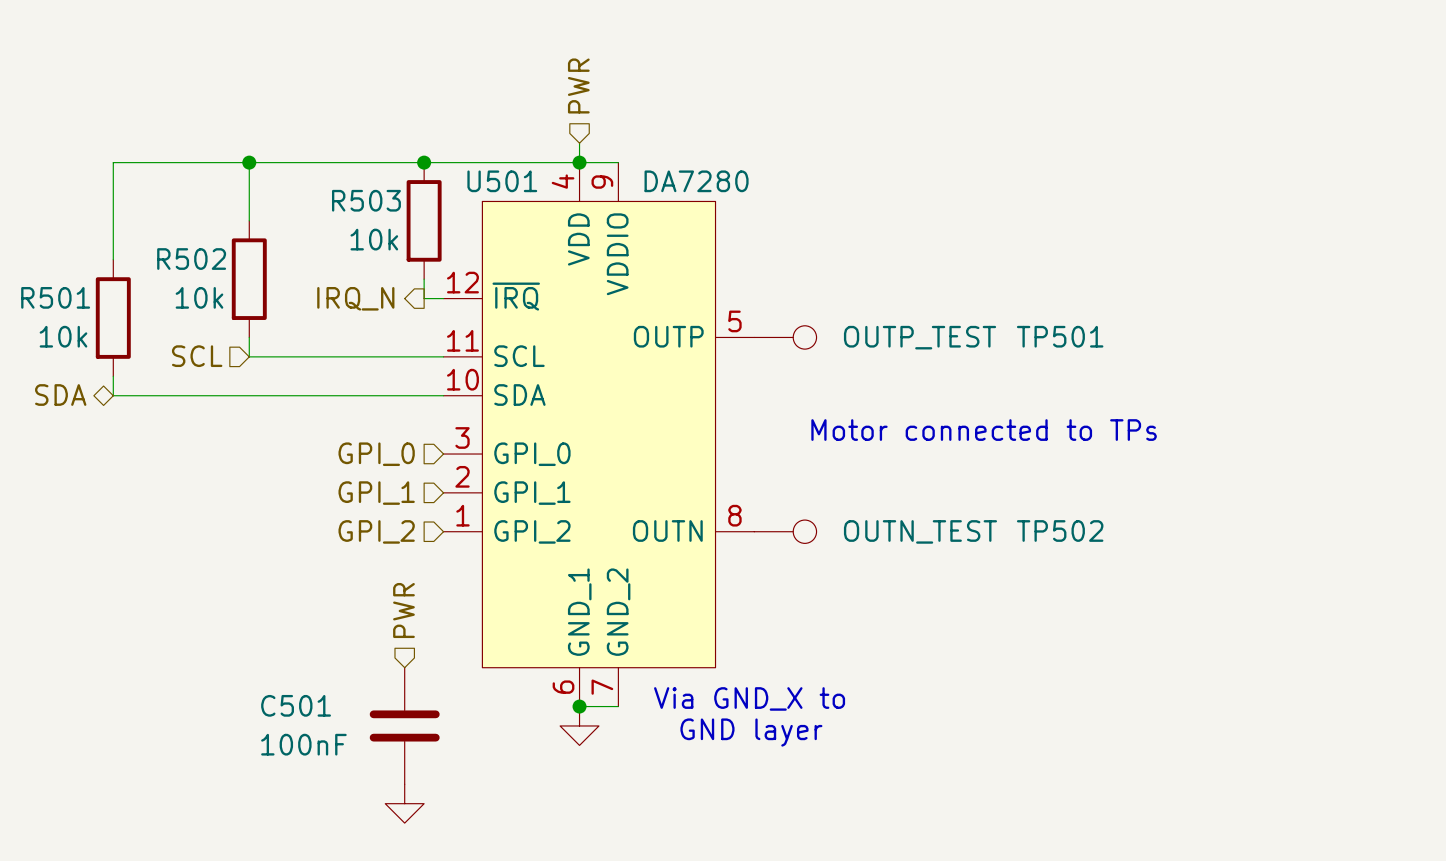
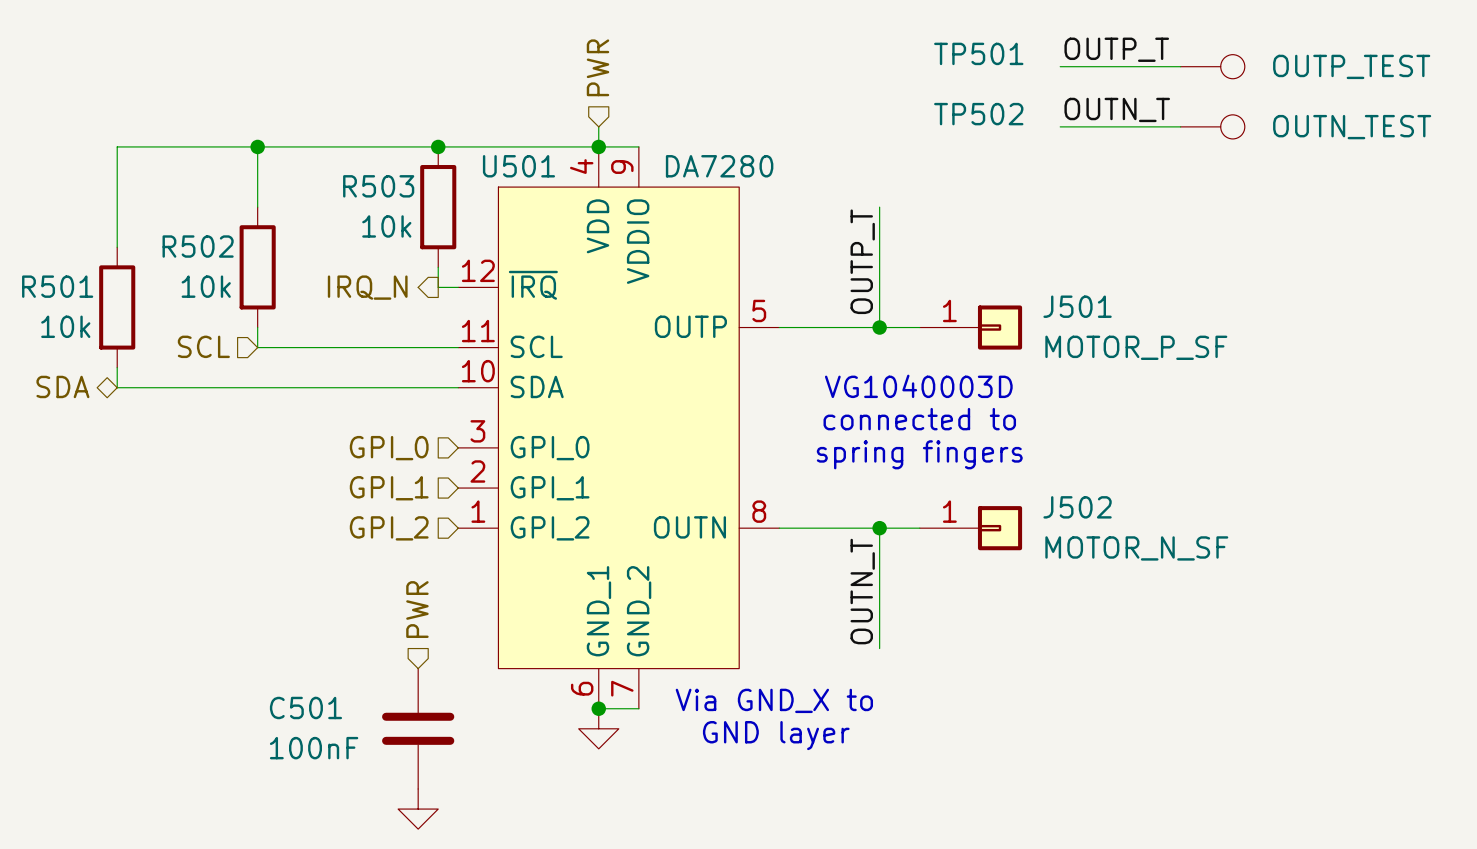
label: none -> OUTP_T (1116, 49)
wire: none -> (1060, 66) (1180, 66)
label: none -> OUTN_T (1117, 109)
wire: none -> (1060, 126) (1180, 126)
wire: none -> (879, 207) (879, 327)
label: none -> OUTP_T (862, 261)
TP501 name position: TP501 (1060, 336) -> TP501 (978, 53)
wire: none -> (779, 327) (919, 327)
TP501 position: (785, 337) -> (1212, 66)
junction: none -> (879, 327)
J501: none -> MOTOR_P_SF (970, 327)
text: none -> VG1040003D (918, 386)
text: Motor connected to TPs (984, 430) -> connected to (919, 419)
text: none -> spring fingers (919, 454)
TP502 name position: TP502 (1060, 530) -> TP502 (978, 114)
wire: none -> (779, 528) (919, 528)
TP502 position: (785, 531) -> (1212, 126)
wire: none -> (879, 528) (879, 648)
junction: none -> (879, 528)
J502: none -> MOTOR_N_SF (970, 528)
label: none -> OUTN_T (862, 591)

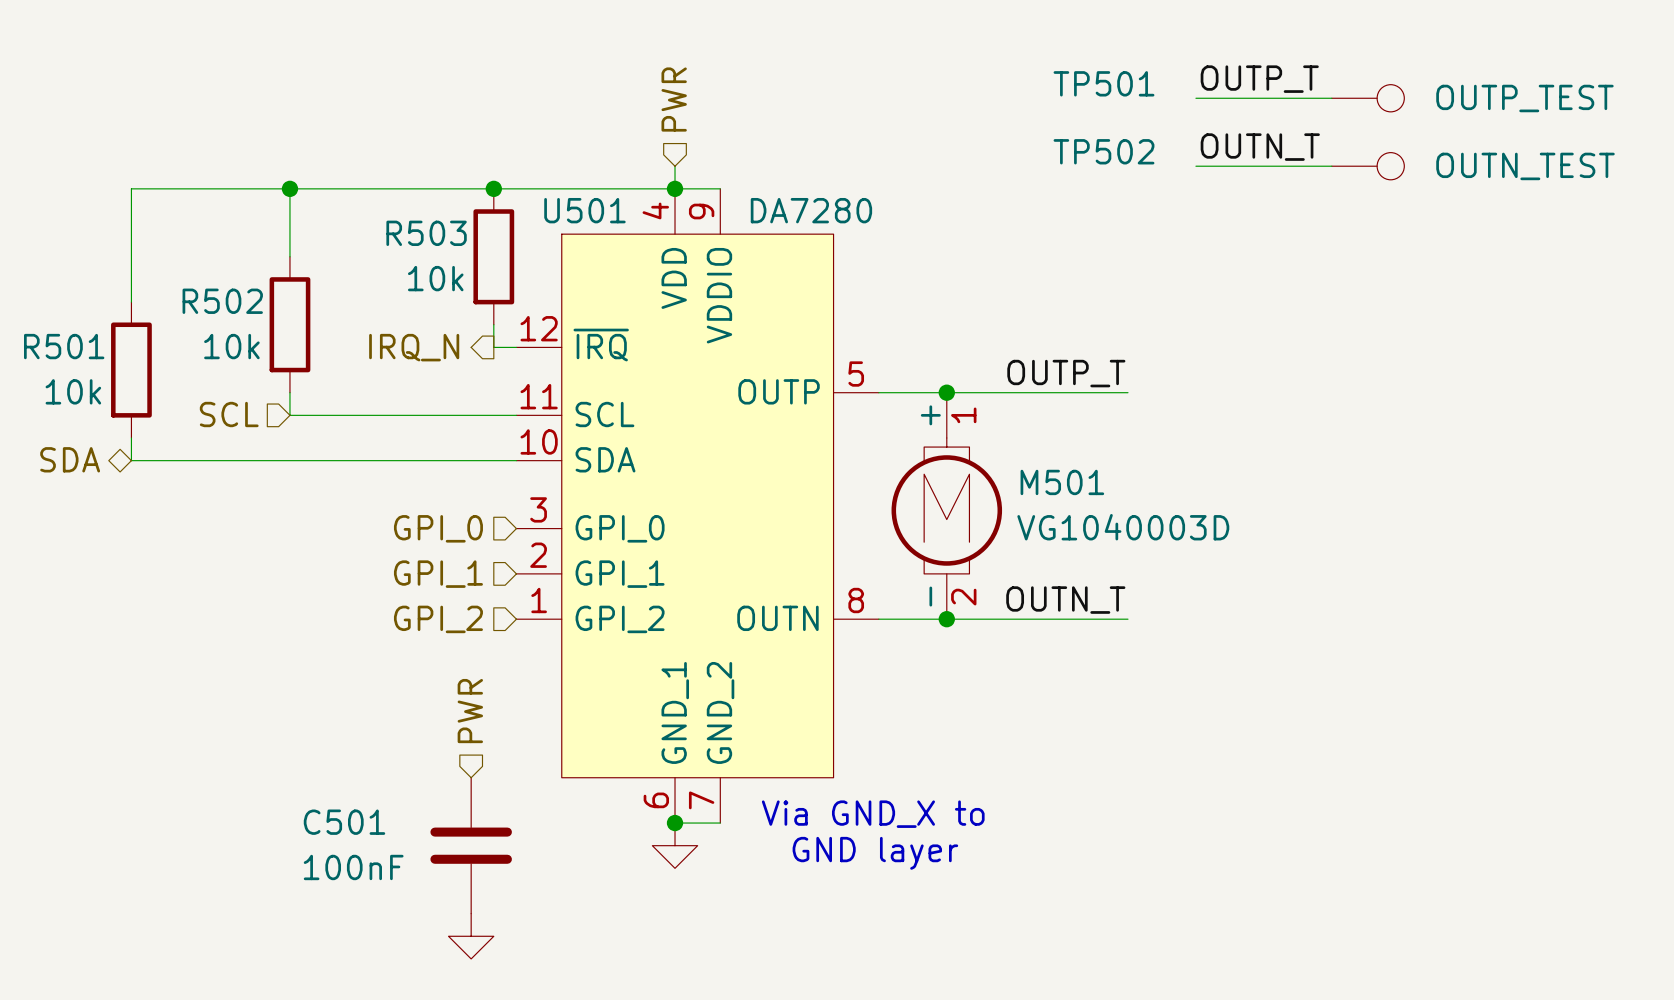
wire: (879, 207) (879, 327) -> none
label rotation: 0° (862, 261) -> 90° clockwise (1066, 373)
junction position: (879, 327) -> (946, 392)
J501: MOTOR_P_SF (970, 327) -> none
text: VG1040003D (918, 386) -> none
text: connected to (919, 419) -> none
M501: none -> VG1040003D (946, 505)
text: spring fingers (919, 454) -> none
wire: (879, 528) (879, 648) -> none
junction position: (879, 528) -> (946, 619)
J502: MOTOR_N_SF (970, 528) -> none
label rotation: 0° (862, 591) -> 90° clockwise (1065, 600)

